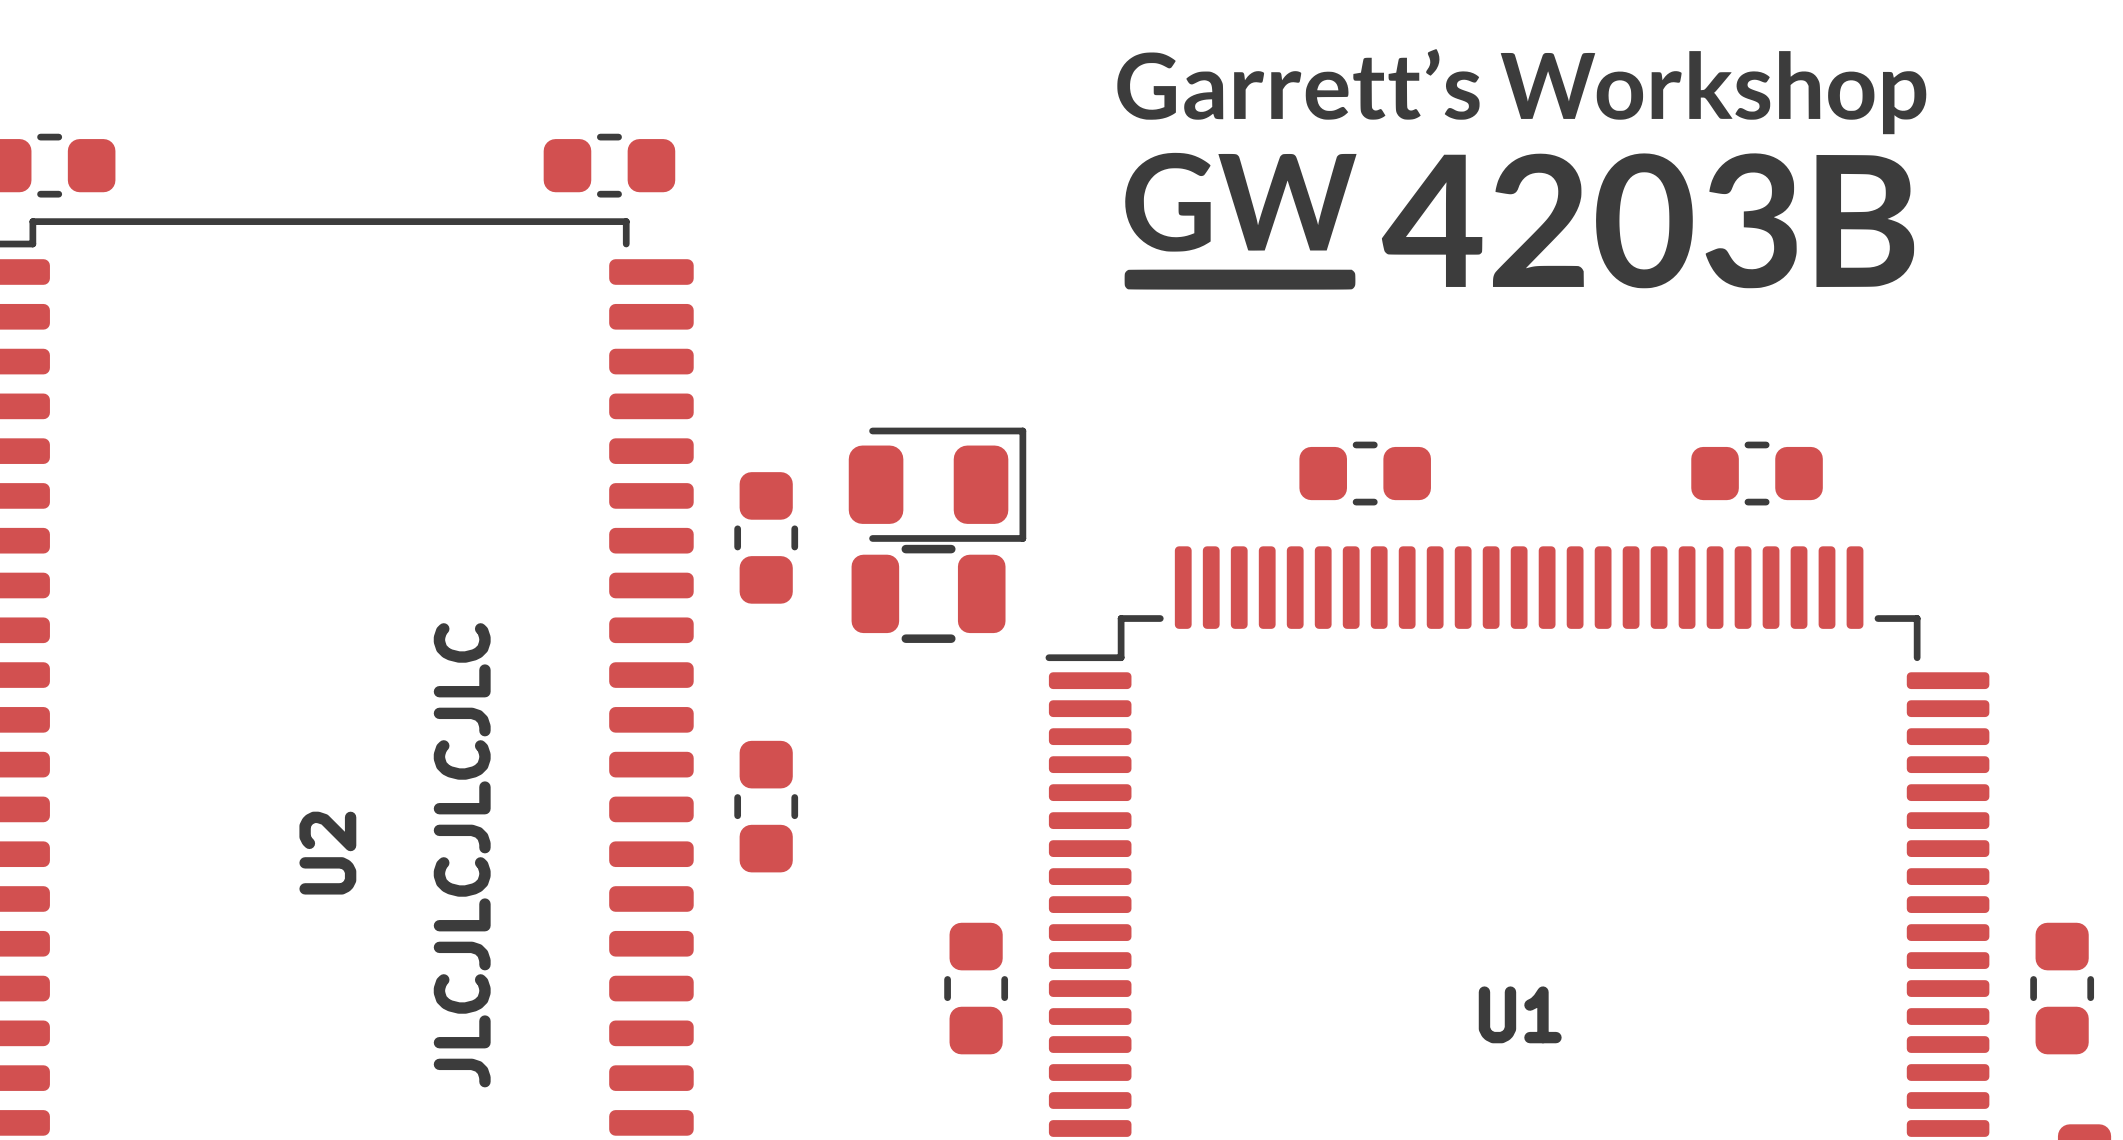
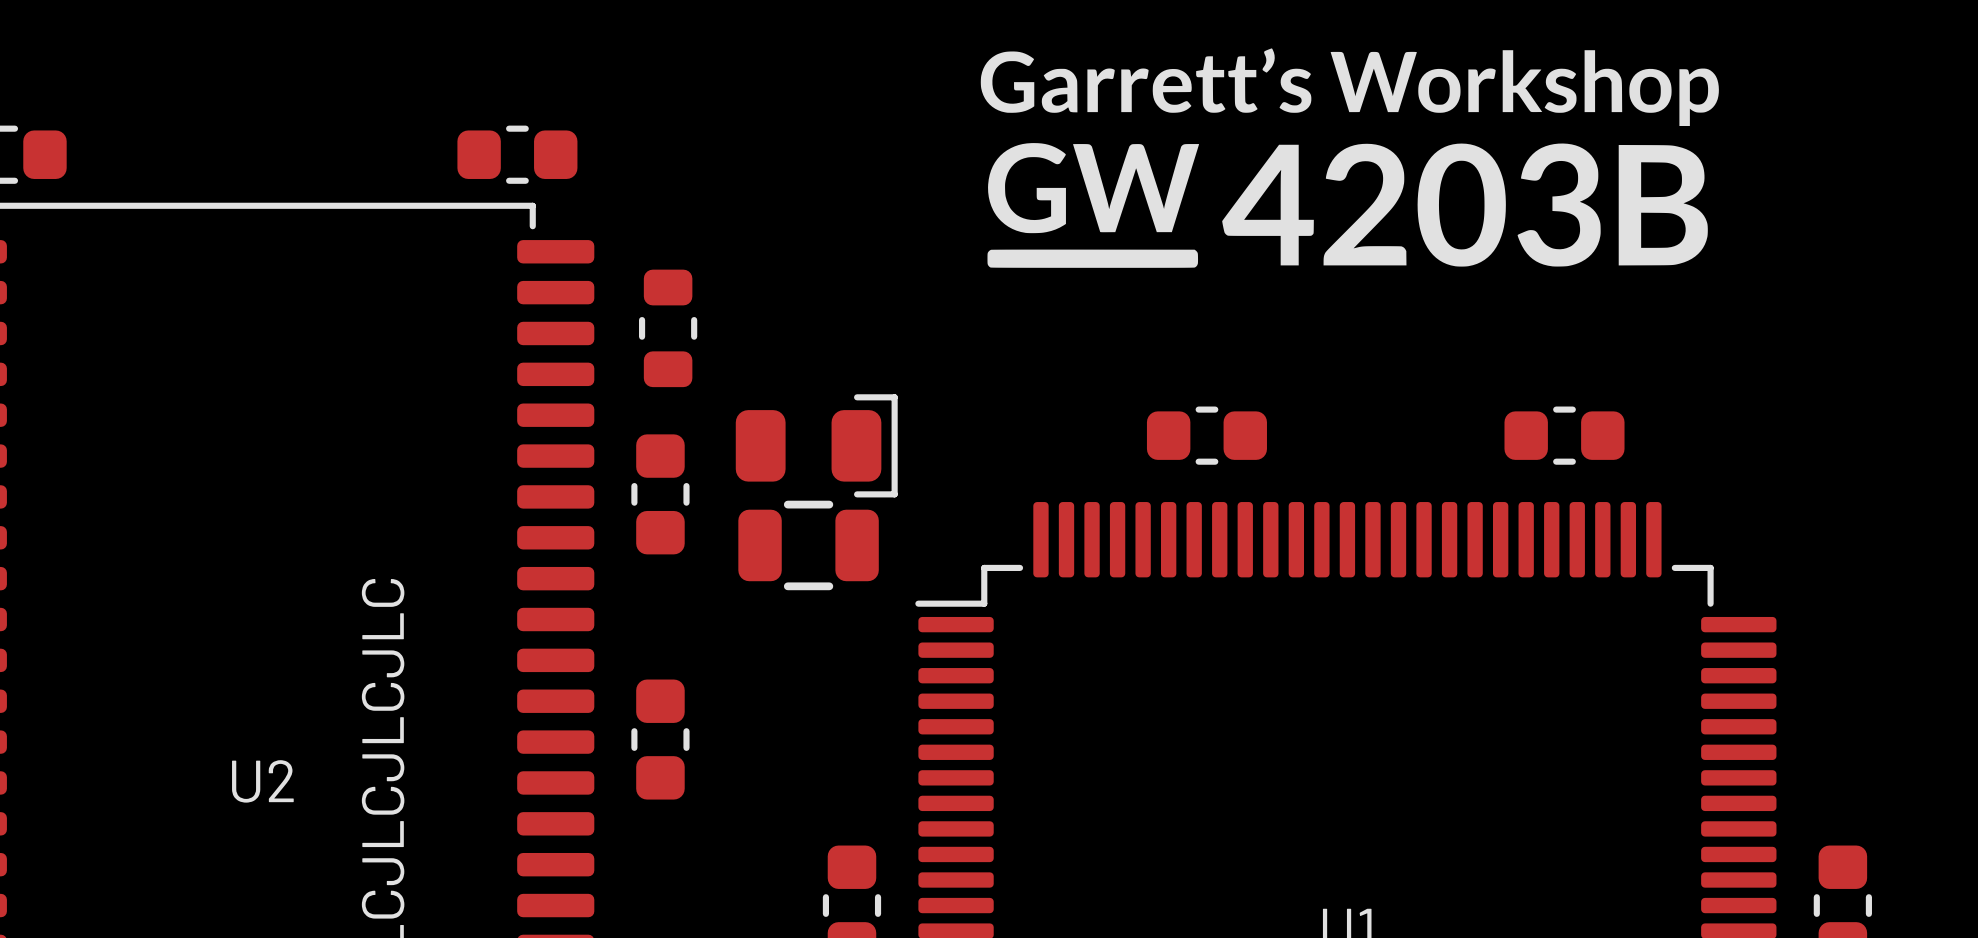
part: none -> (668, 328)
part footprint: [848, 427, 1027, 542] -> [735, 394, 898, 498]
U2 name rotation: 0° (327, 853) -> 90° clockwise (262, 781)

